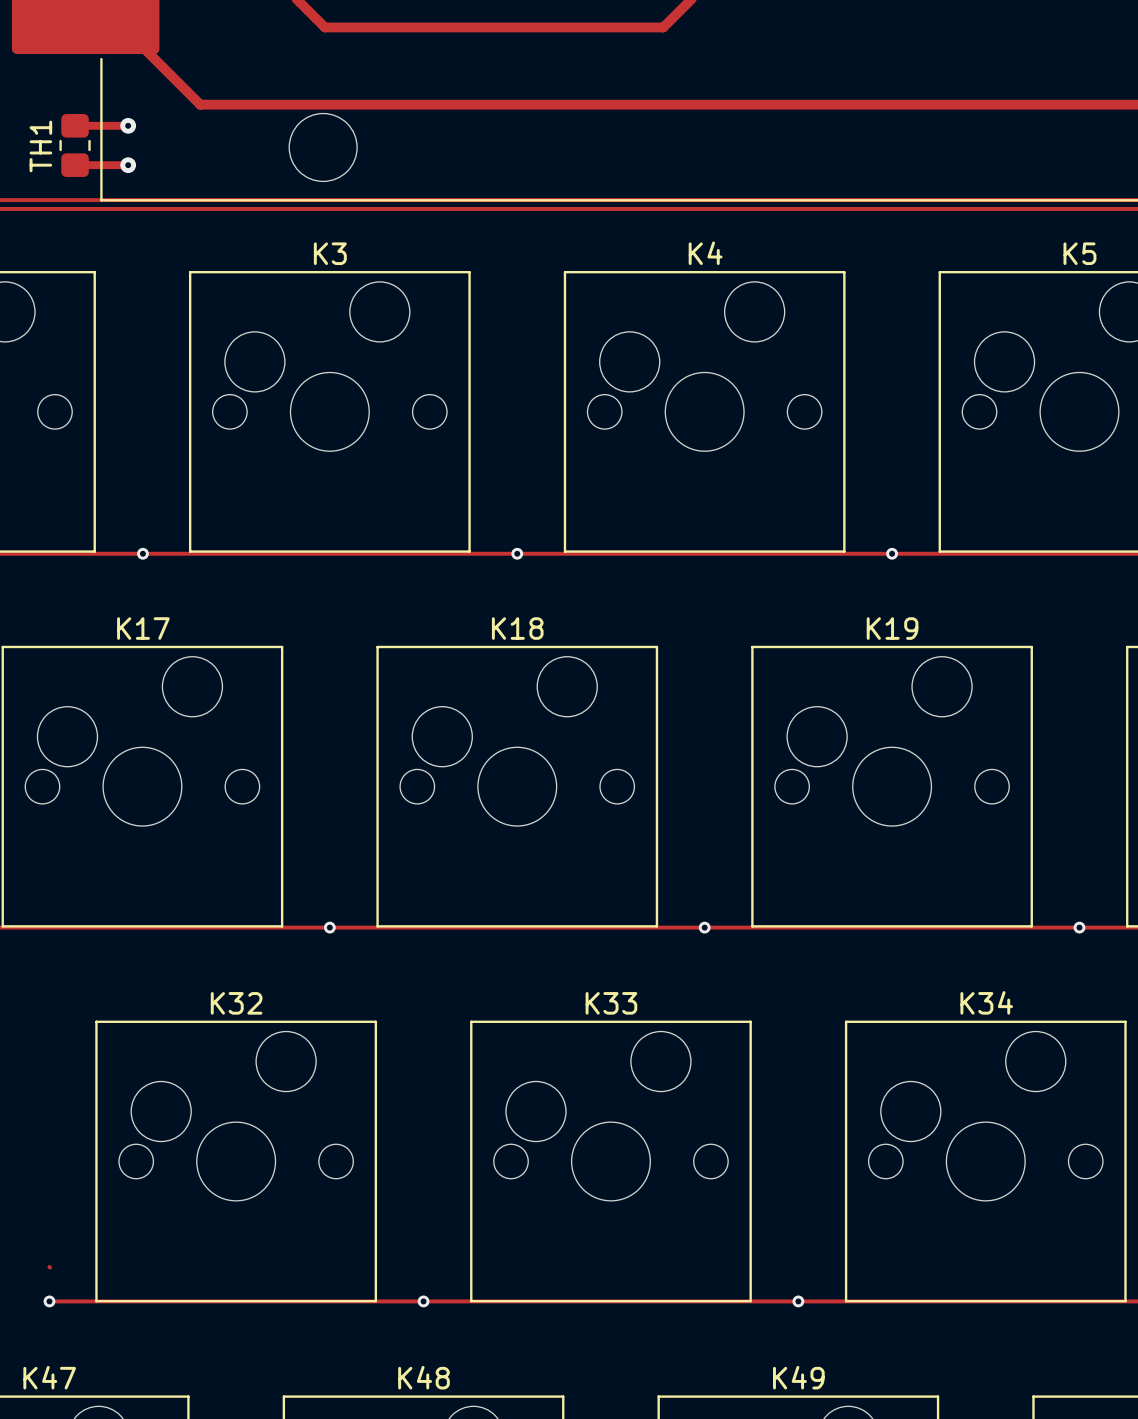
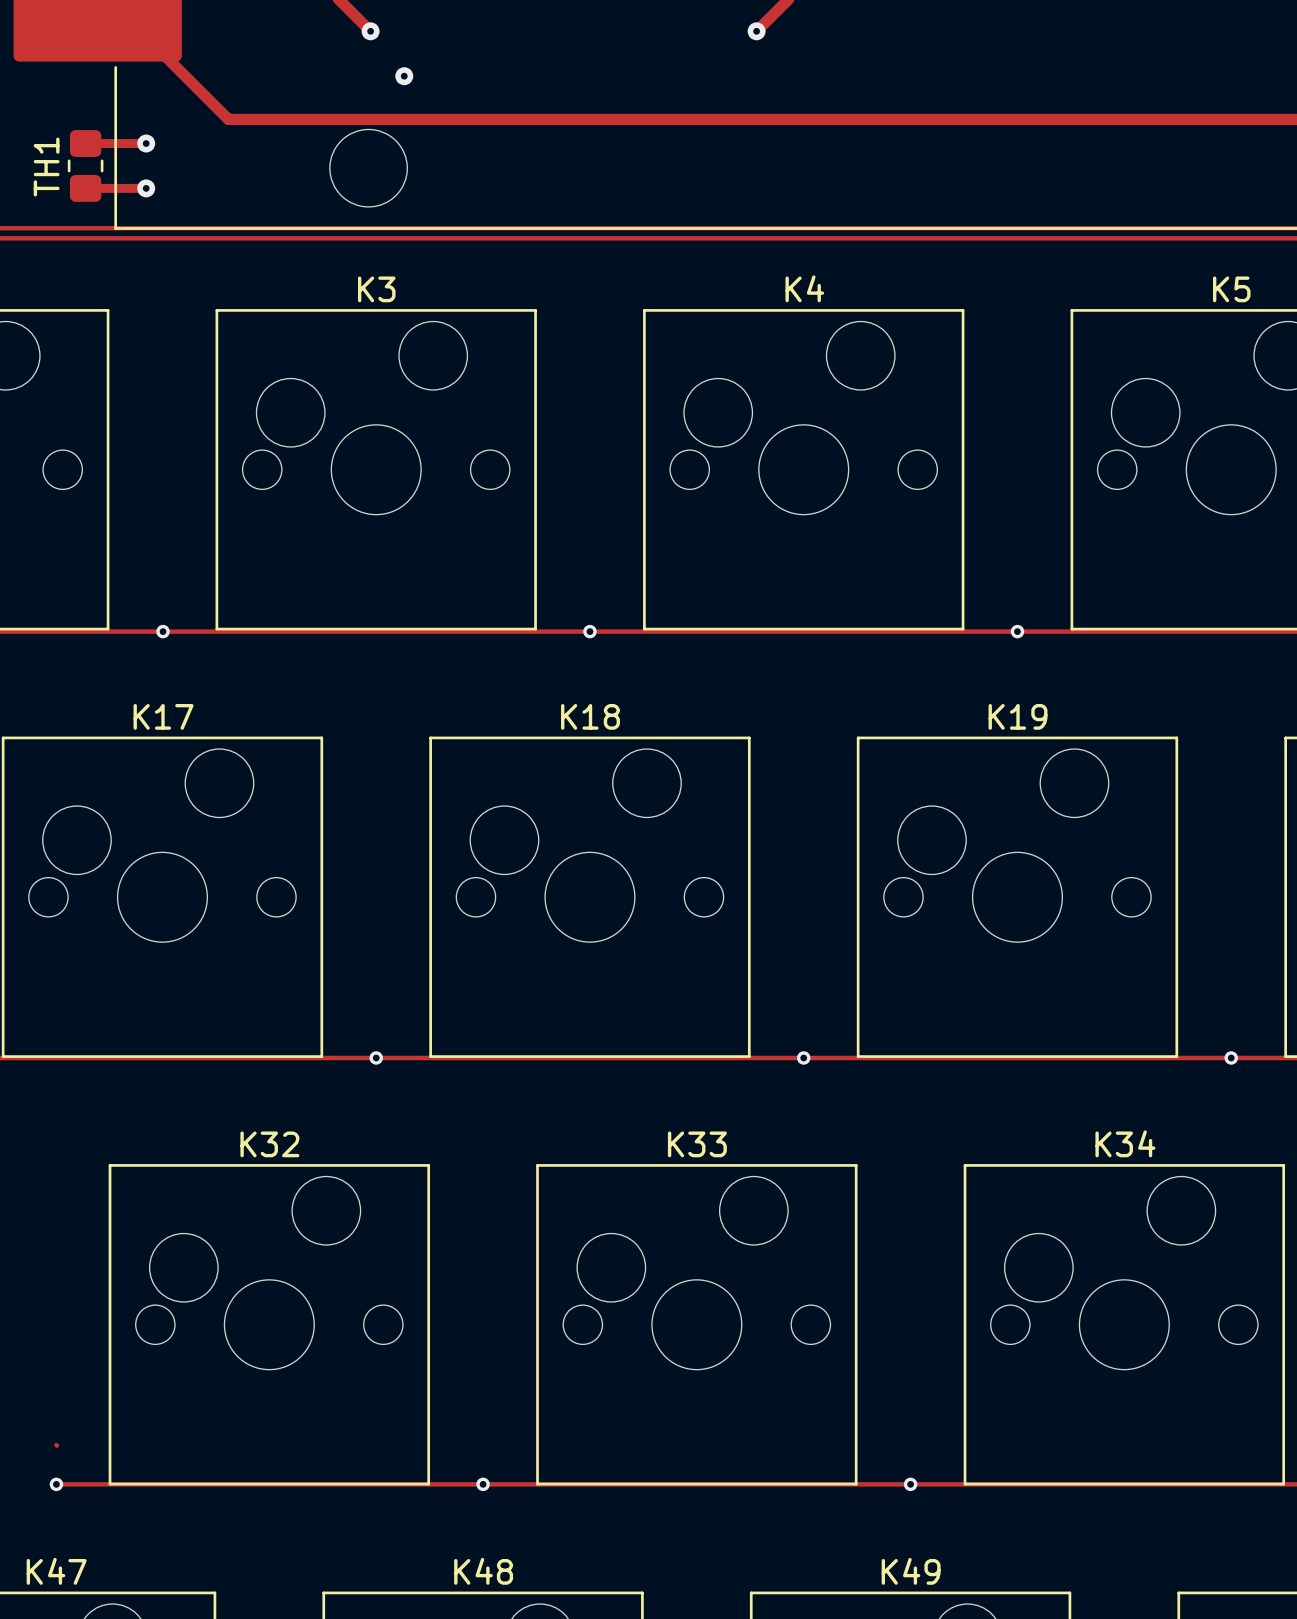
track: (324, 27) (663, 27) -> none
via: none -> (370, 31)
via: none -> (756, 31)
via: none -> (404, 76)

